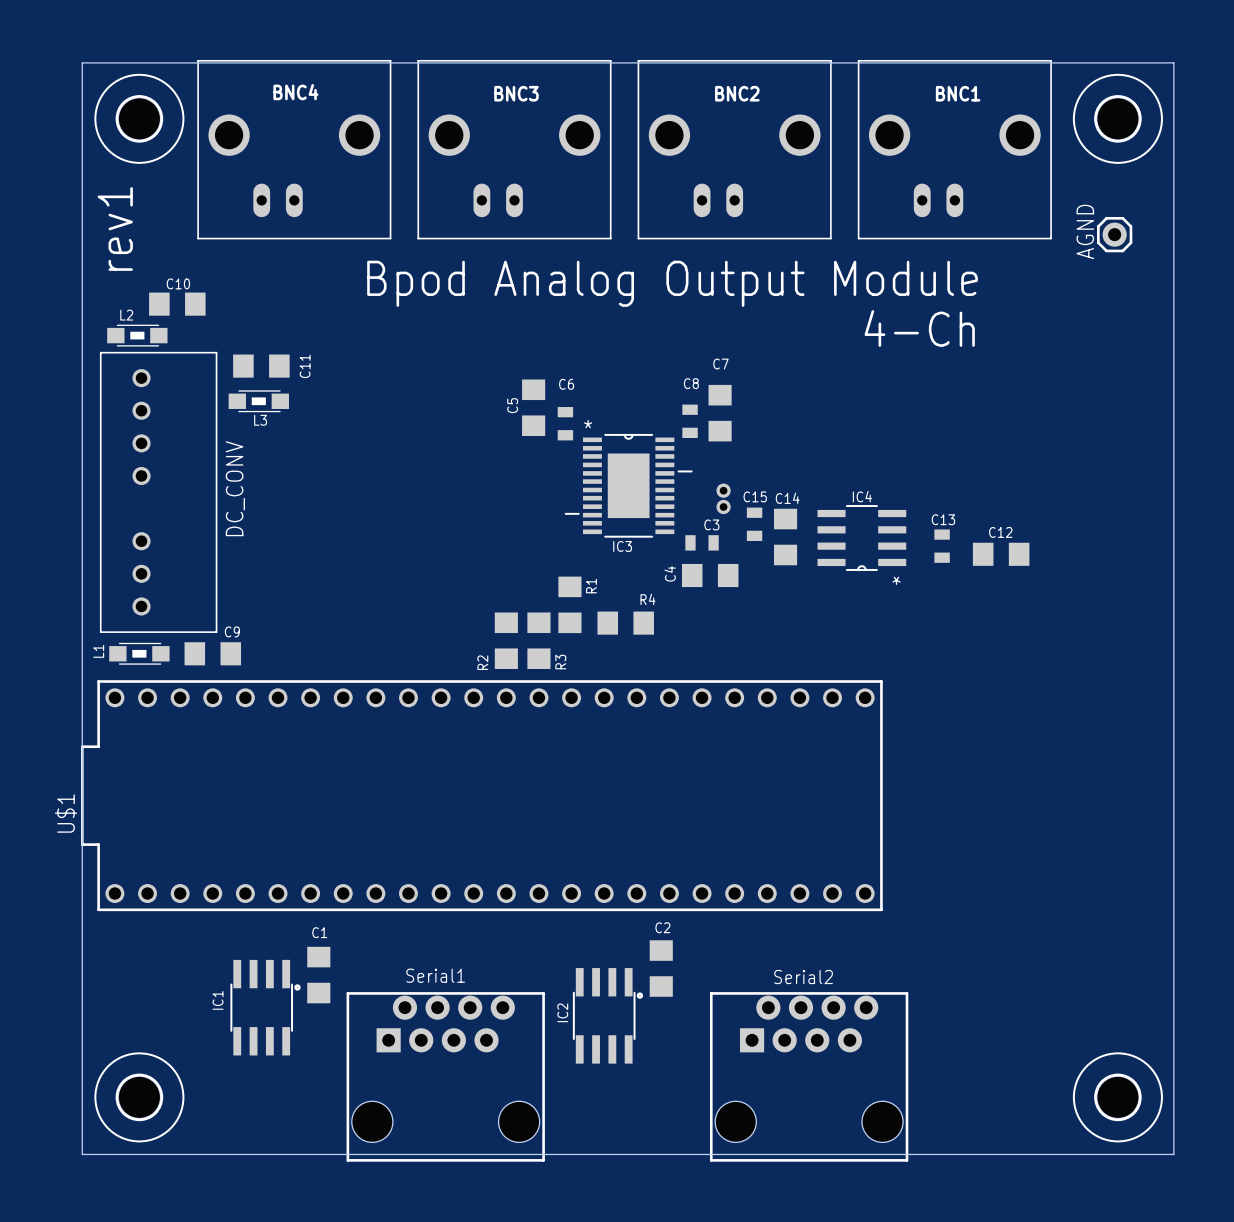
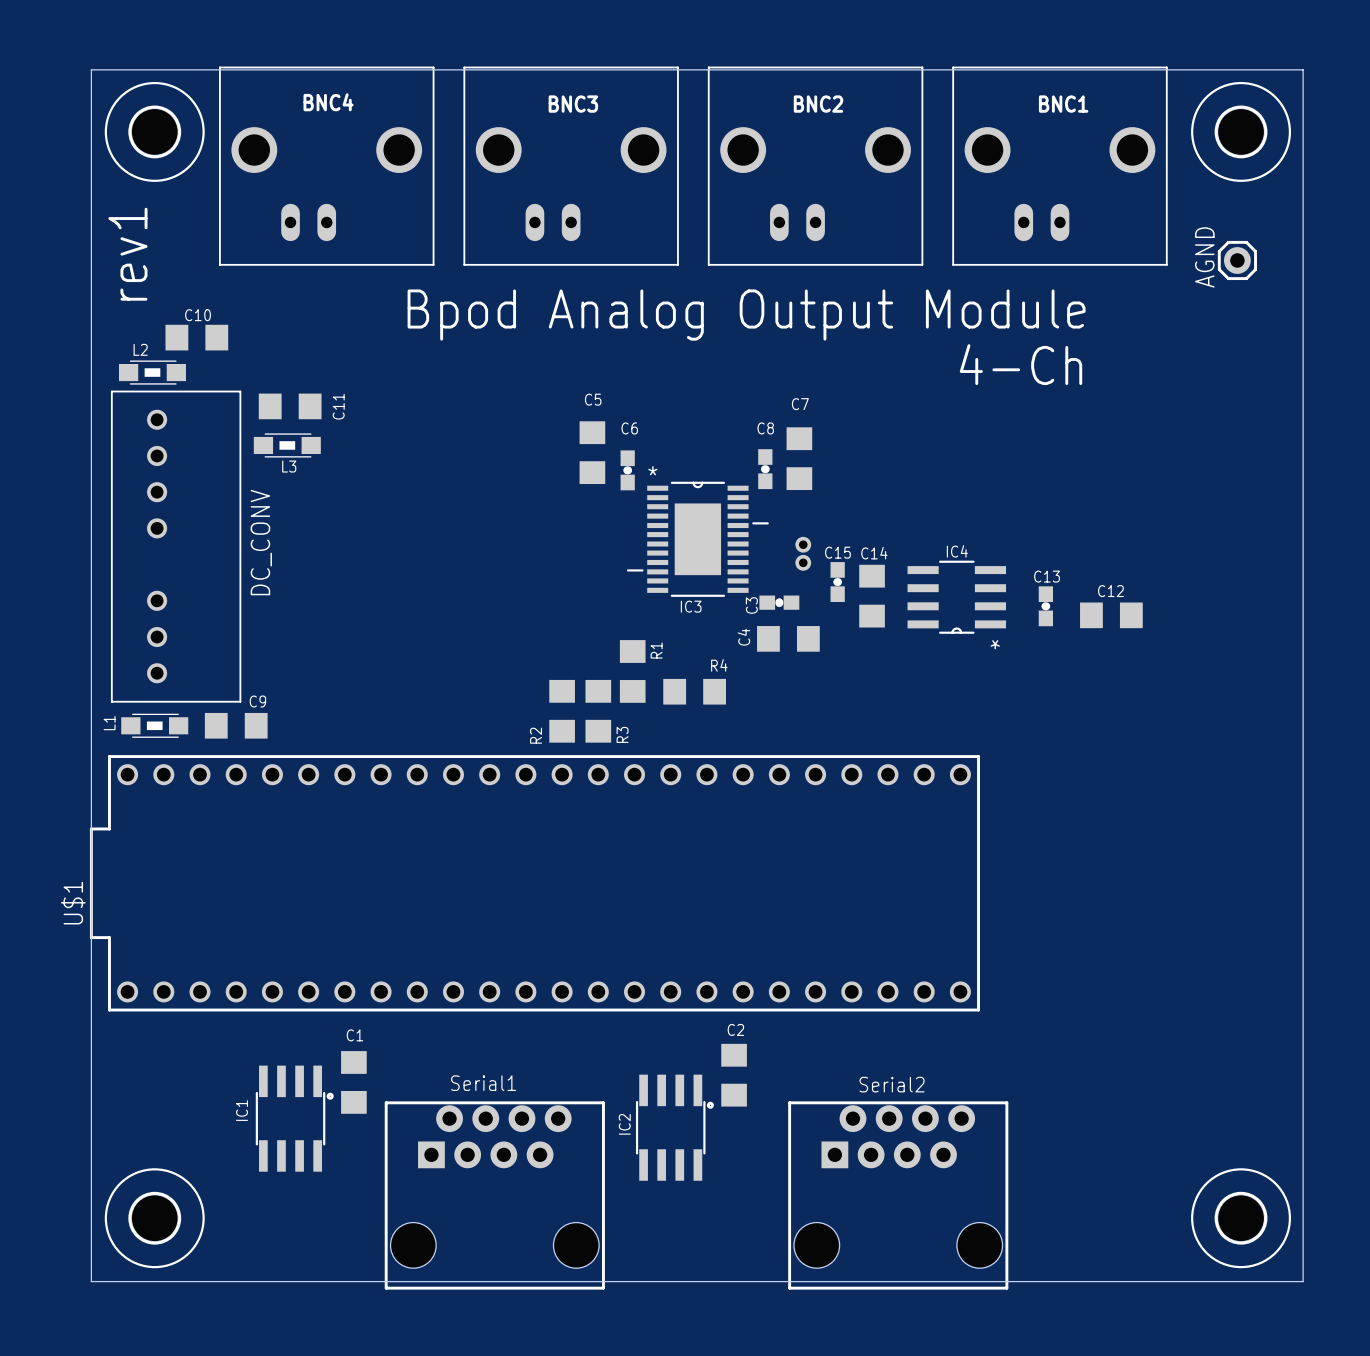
C8 footprint: [682, 404, 698, 438] -> [758, 449, 773, 490]
C5 name rotation: 0° (512, 405) -> 90° clockwise (593, 399)
C5 name position: C5 (512, 405) -> C5 (593, 399)
C6 footprint: [557, 407, 574, 441] -> [620, 450, 635, 491]
C15 footprint: [746, 507, 763, 541] -> [830, 562, 845, 602]
C3 name position: C3 (711, 524) -> C3 (751, 605)
C13 footprint: [934, 529, 950, 563] -> [1038, 586, 1053, 627]
C3 footprint: [685, 535, 719, 551] -> [759, 595, 800, 610]

